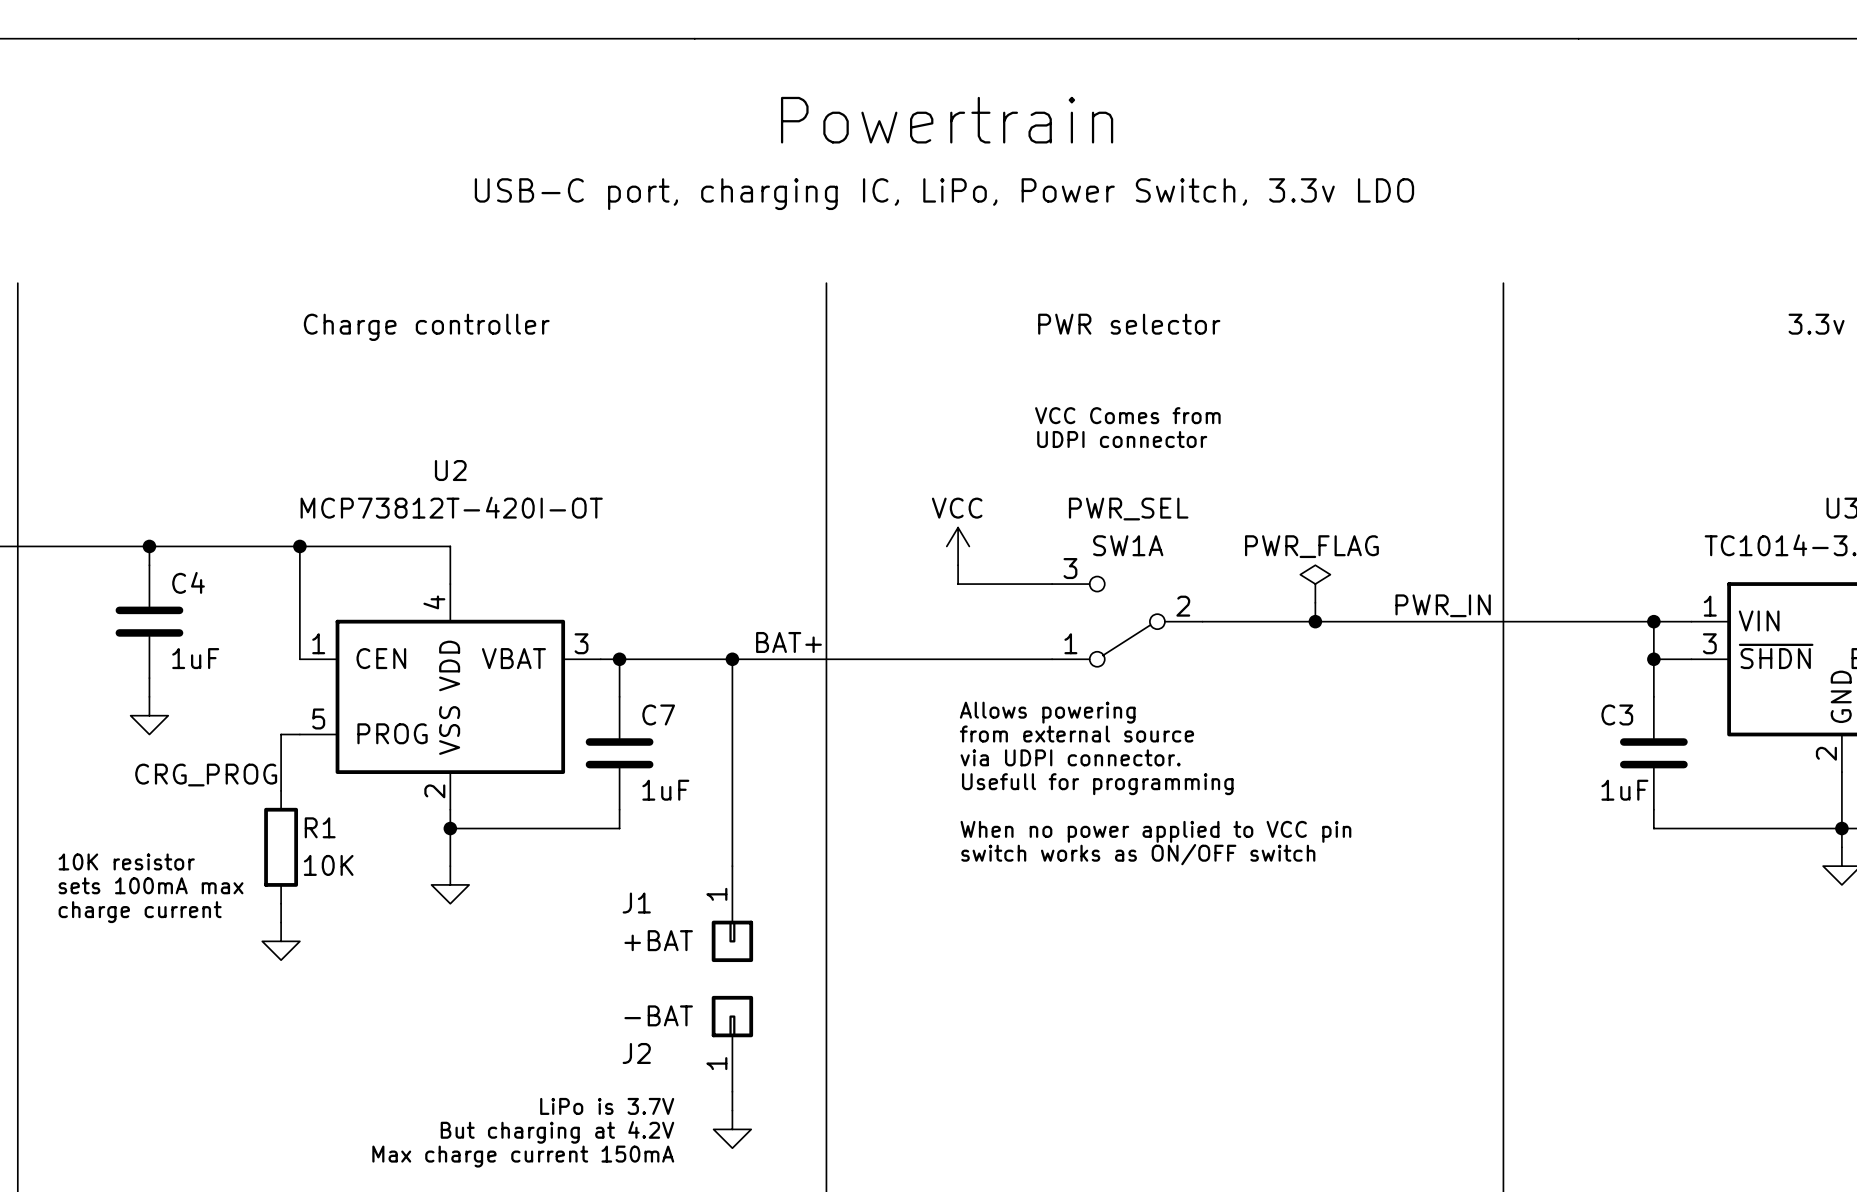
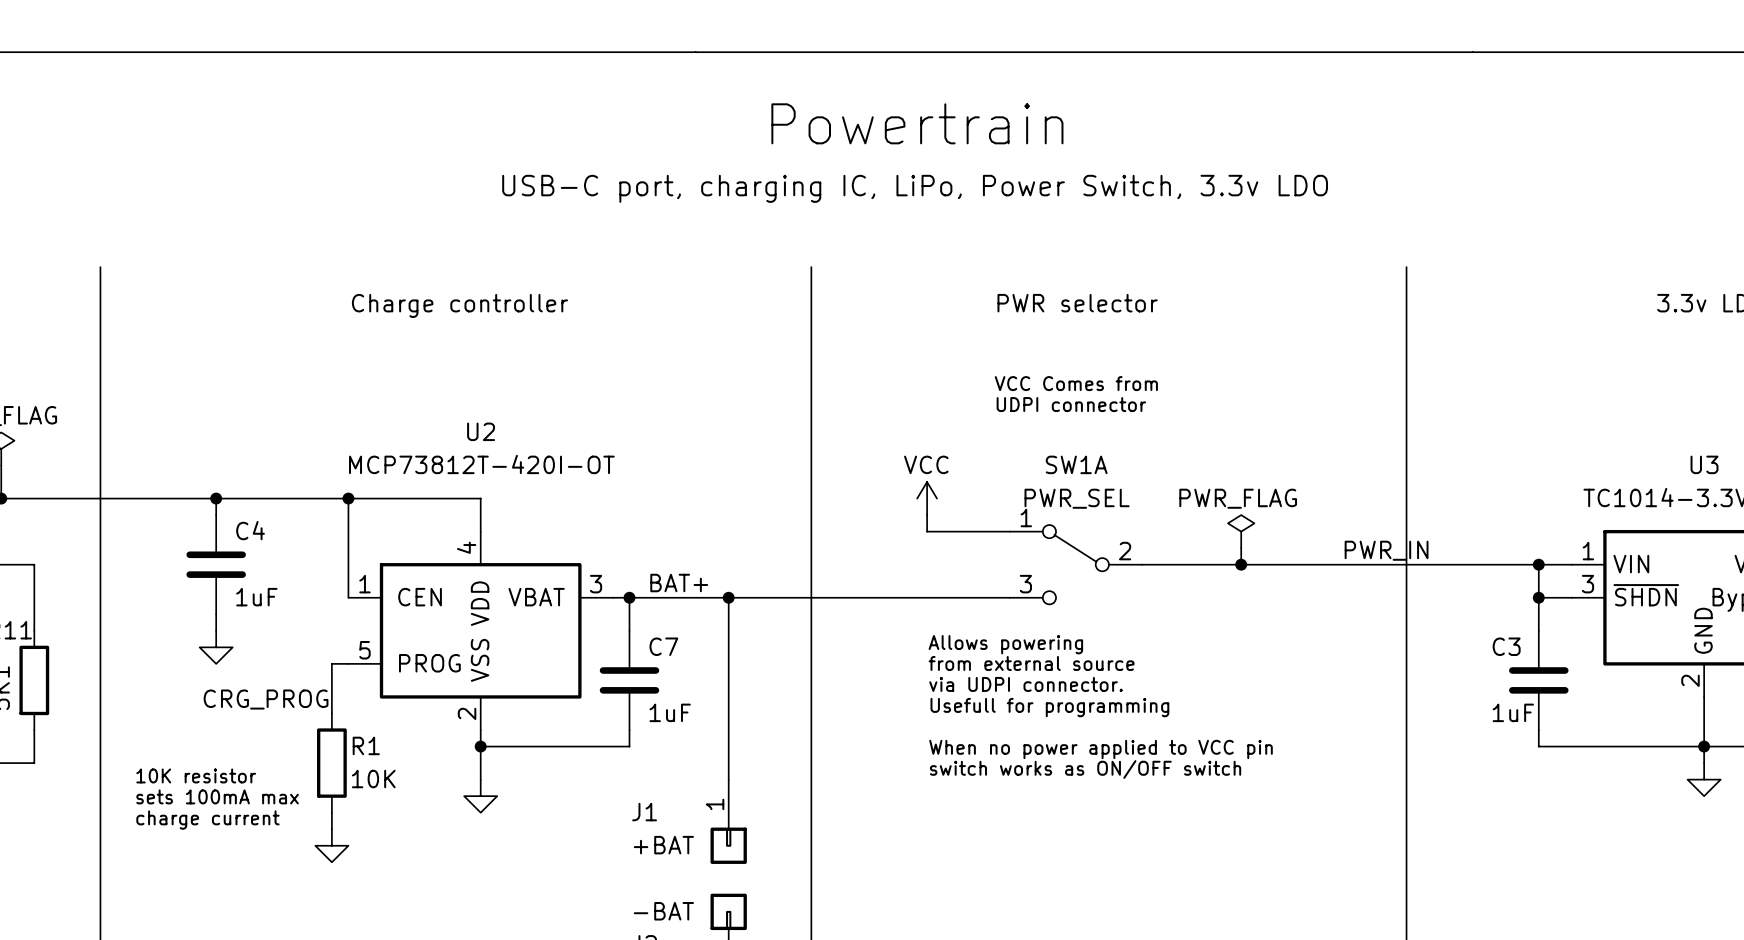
SW1A value position: PWR_SEL (1128, 509) -> PWR_SEL (1077, 498)
SW1A name position: SW1A (1128, 545) -> SW1A (1076, 464)
label position: PWR_IN (1443, 605) -> PWR_IN (1386, 550)
SW1A flip: as is (1127, 621) -> up-down (1075, 564)
label position: BAT+ (788, 642) -> BAT+ (679, 583)

